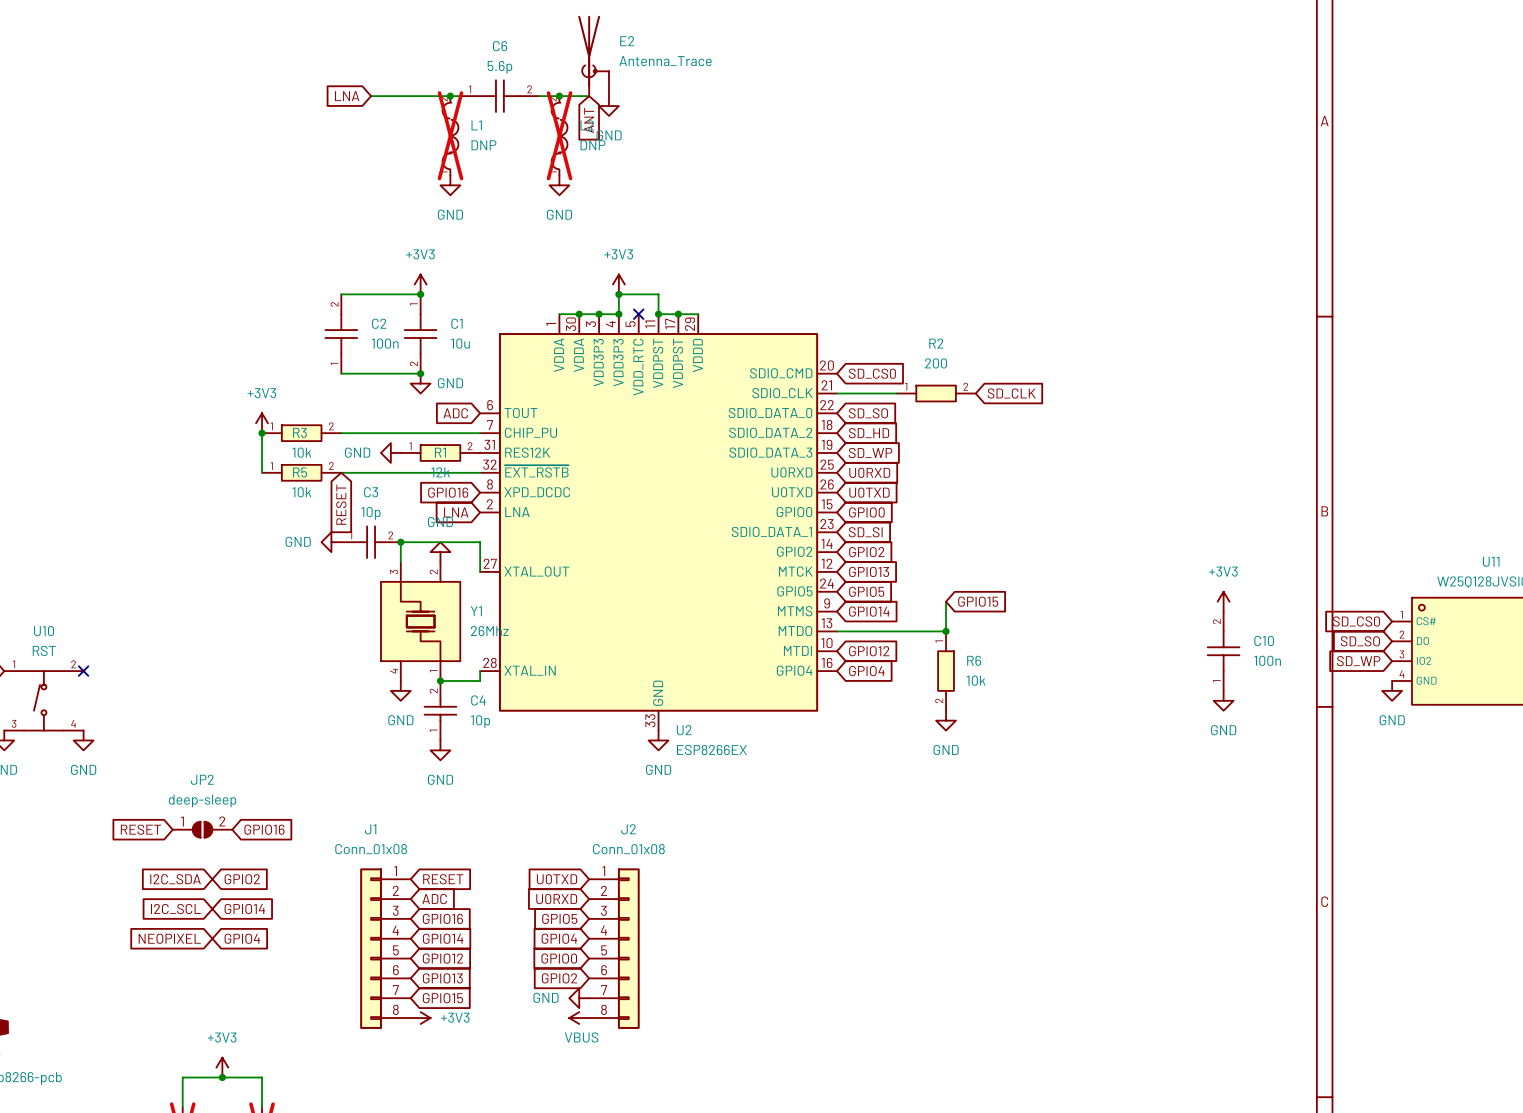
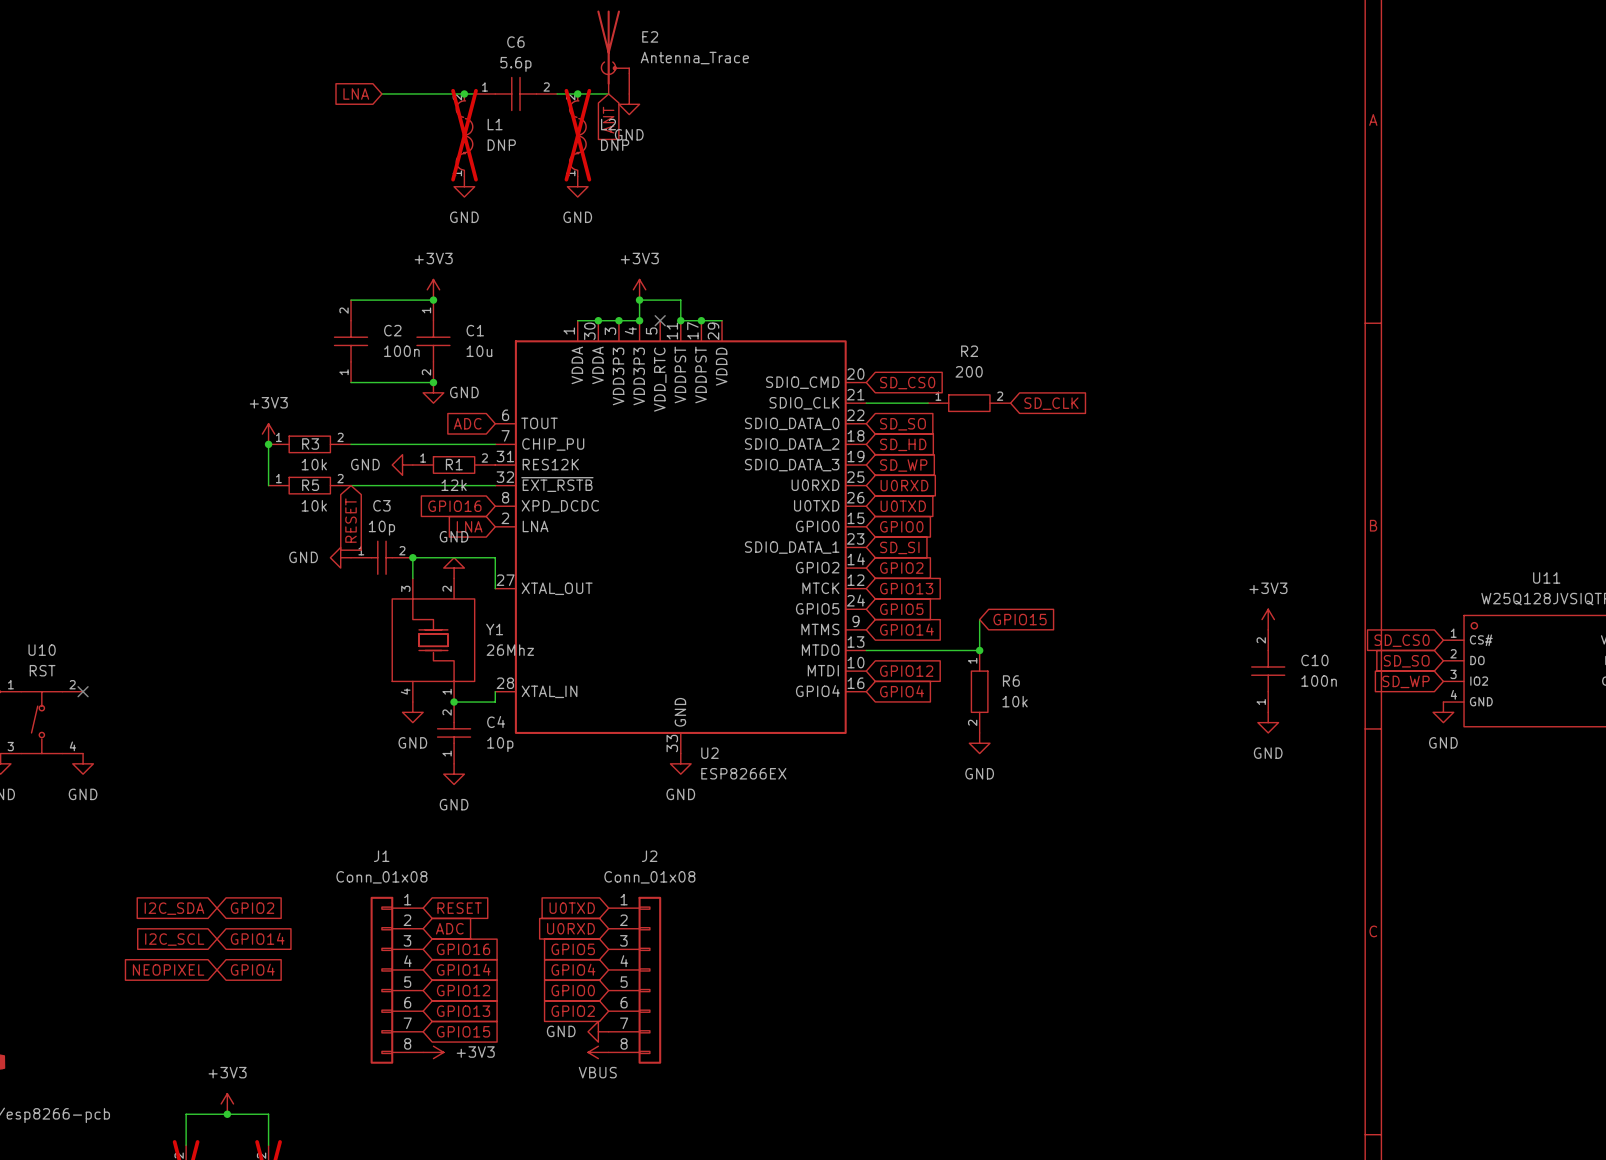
global label: RESET (140, 829) -> none
JP2: deep-sleep (202, 829) -> none
global label: GPIO16 (264, 829) -> none

